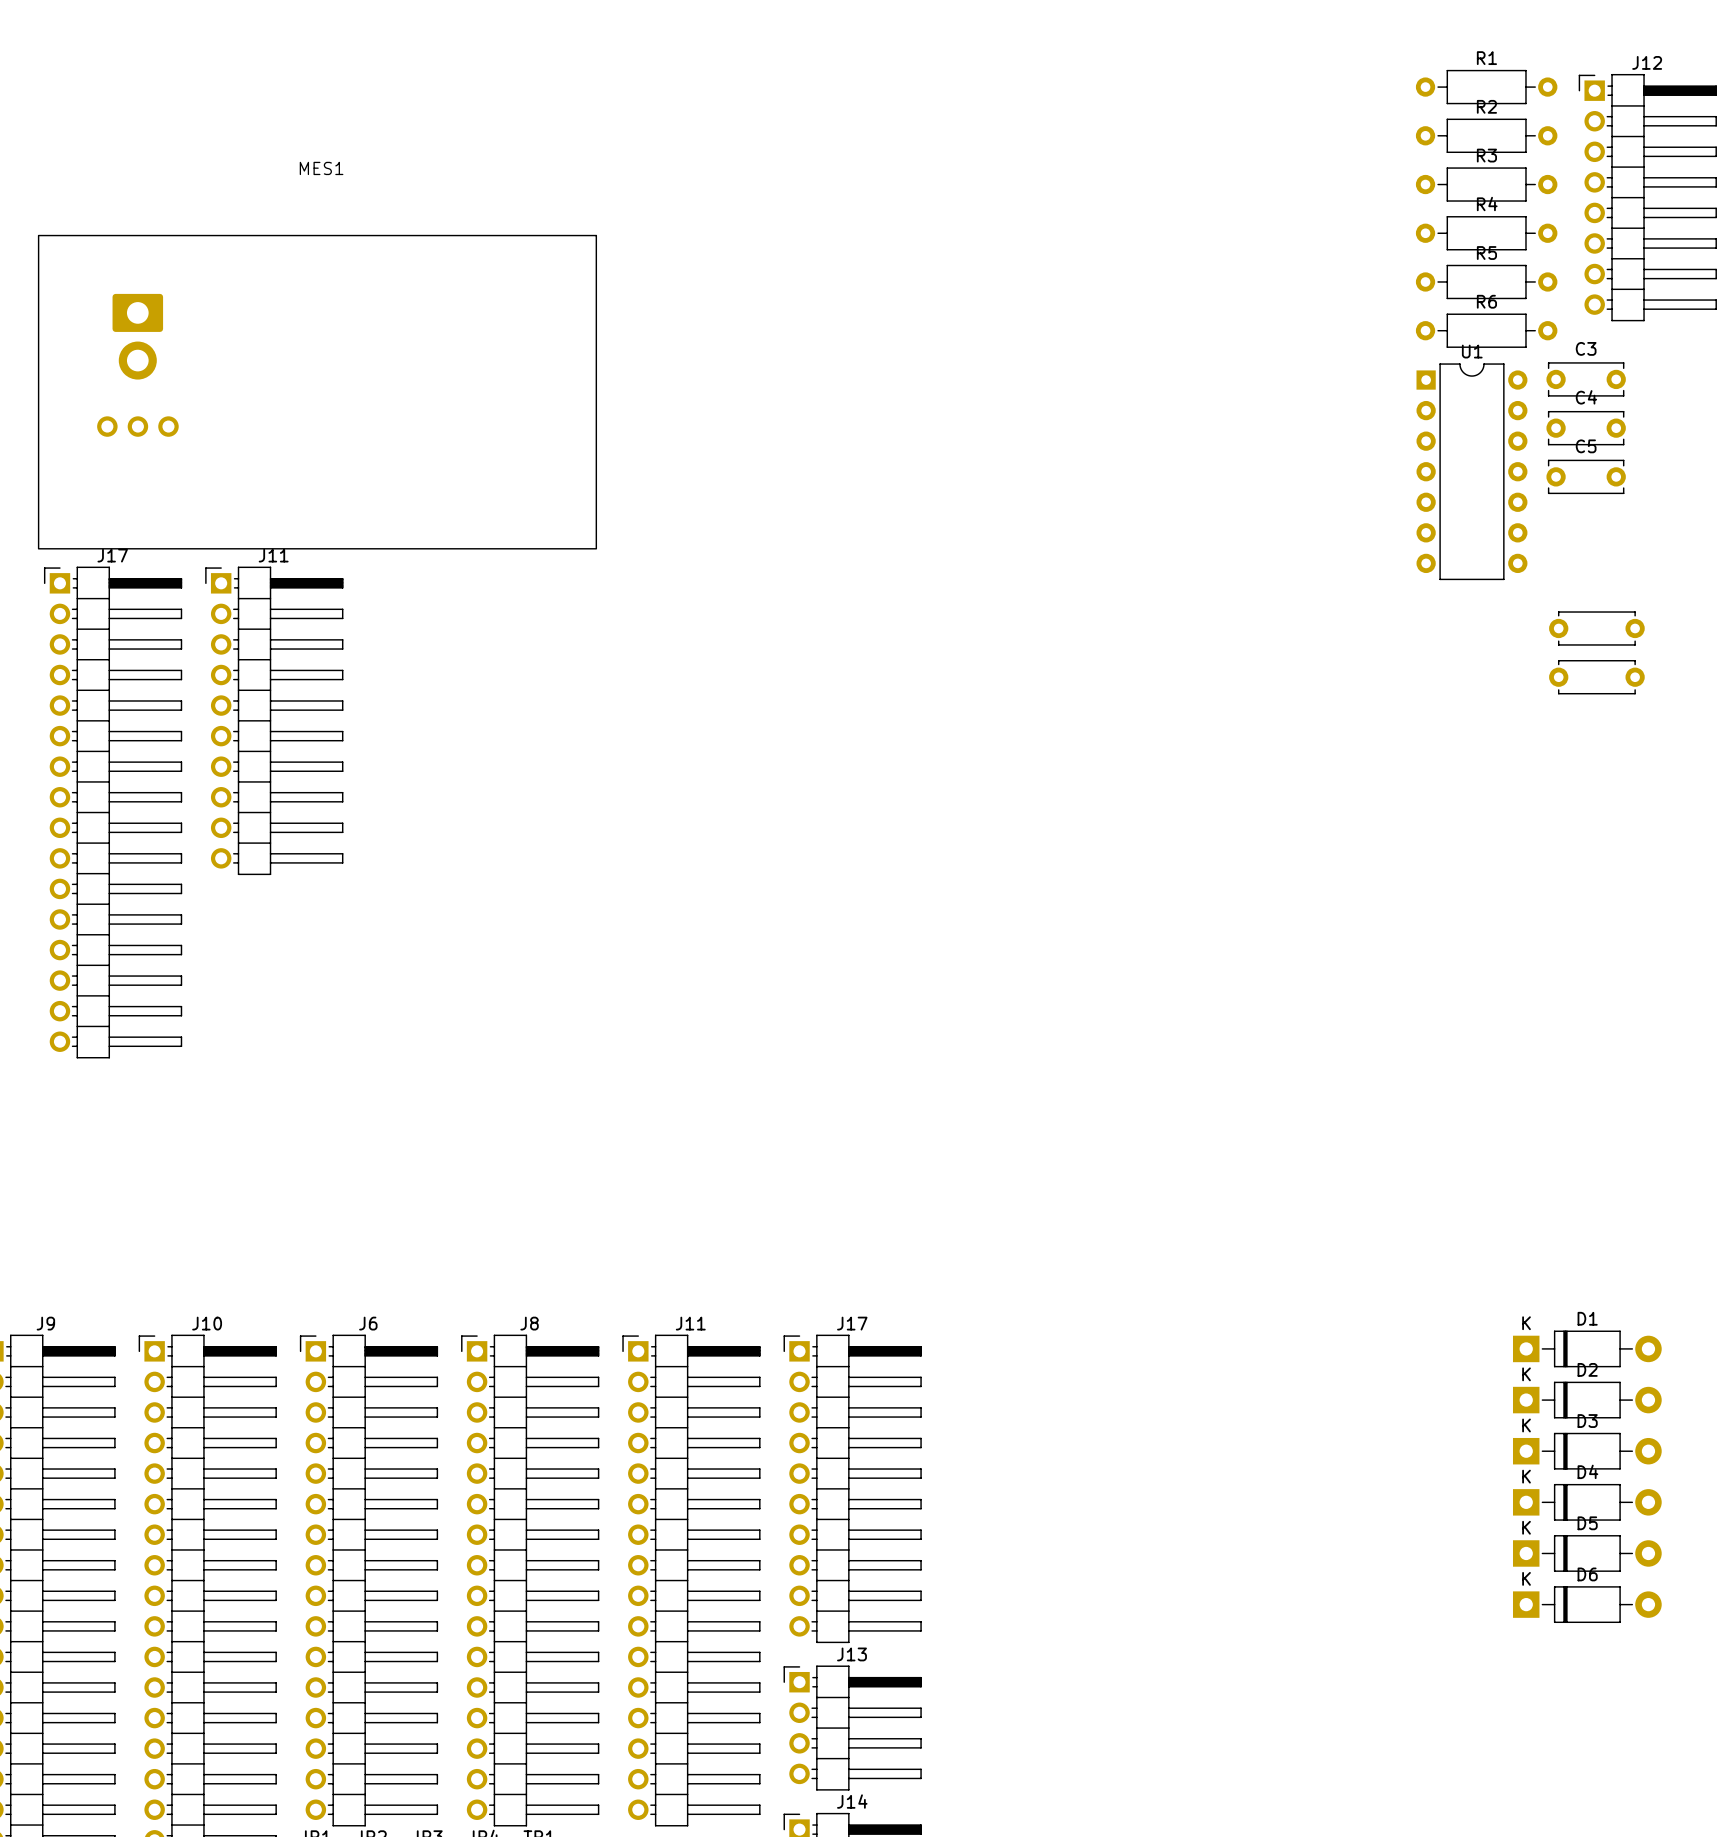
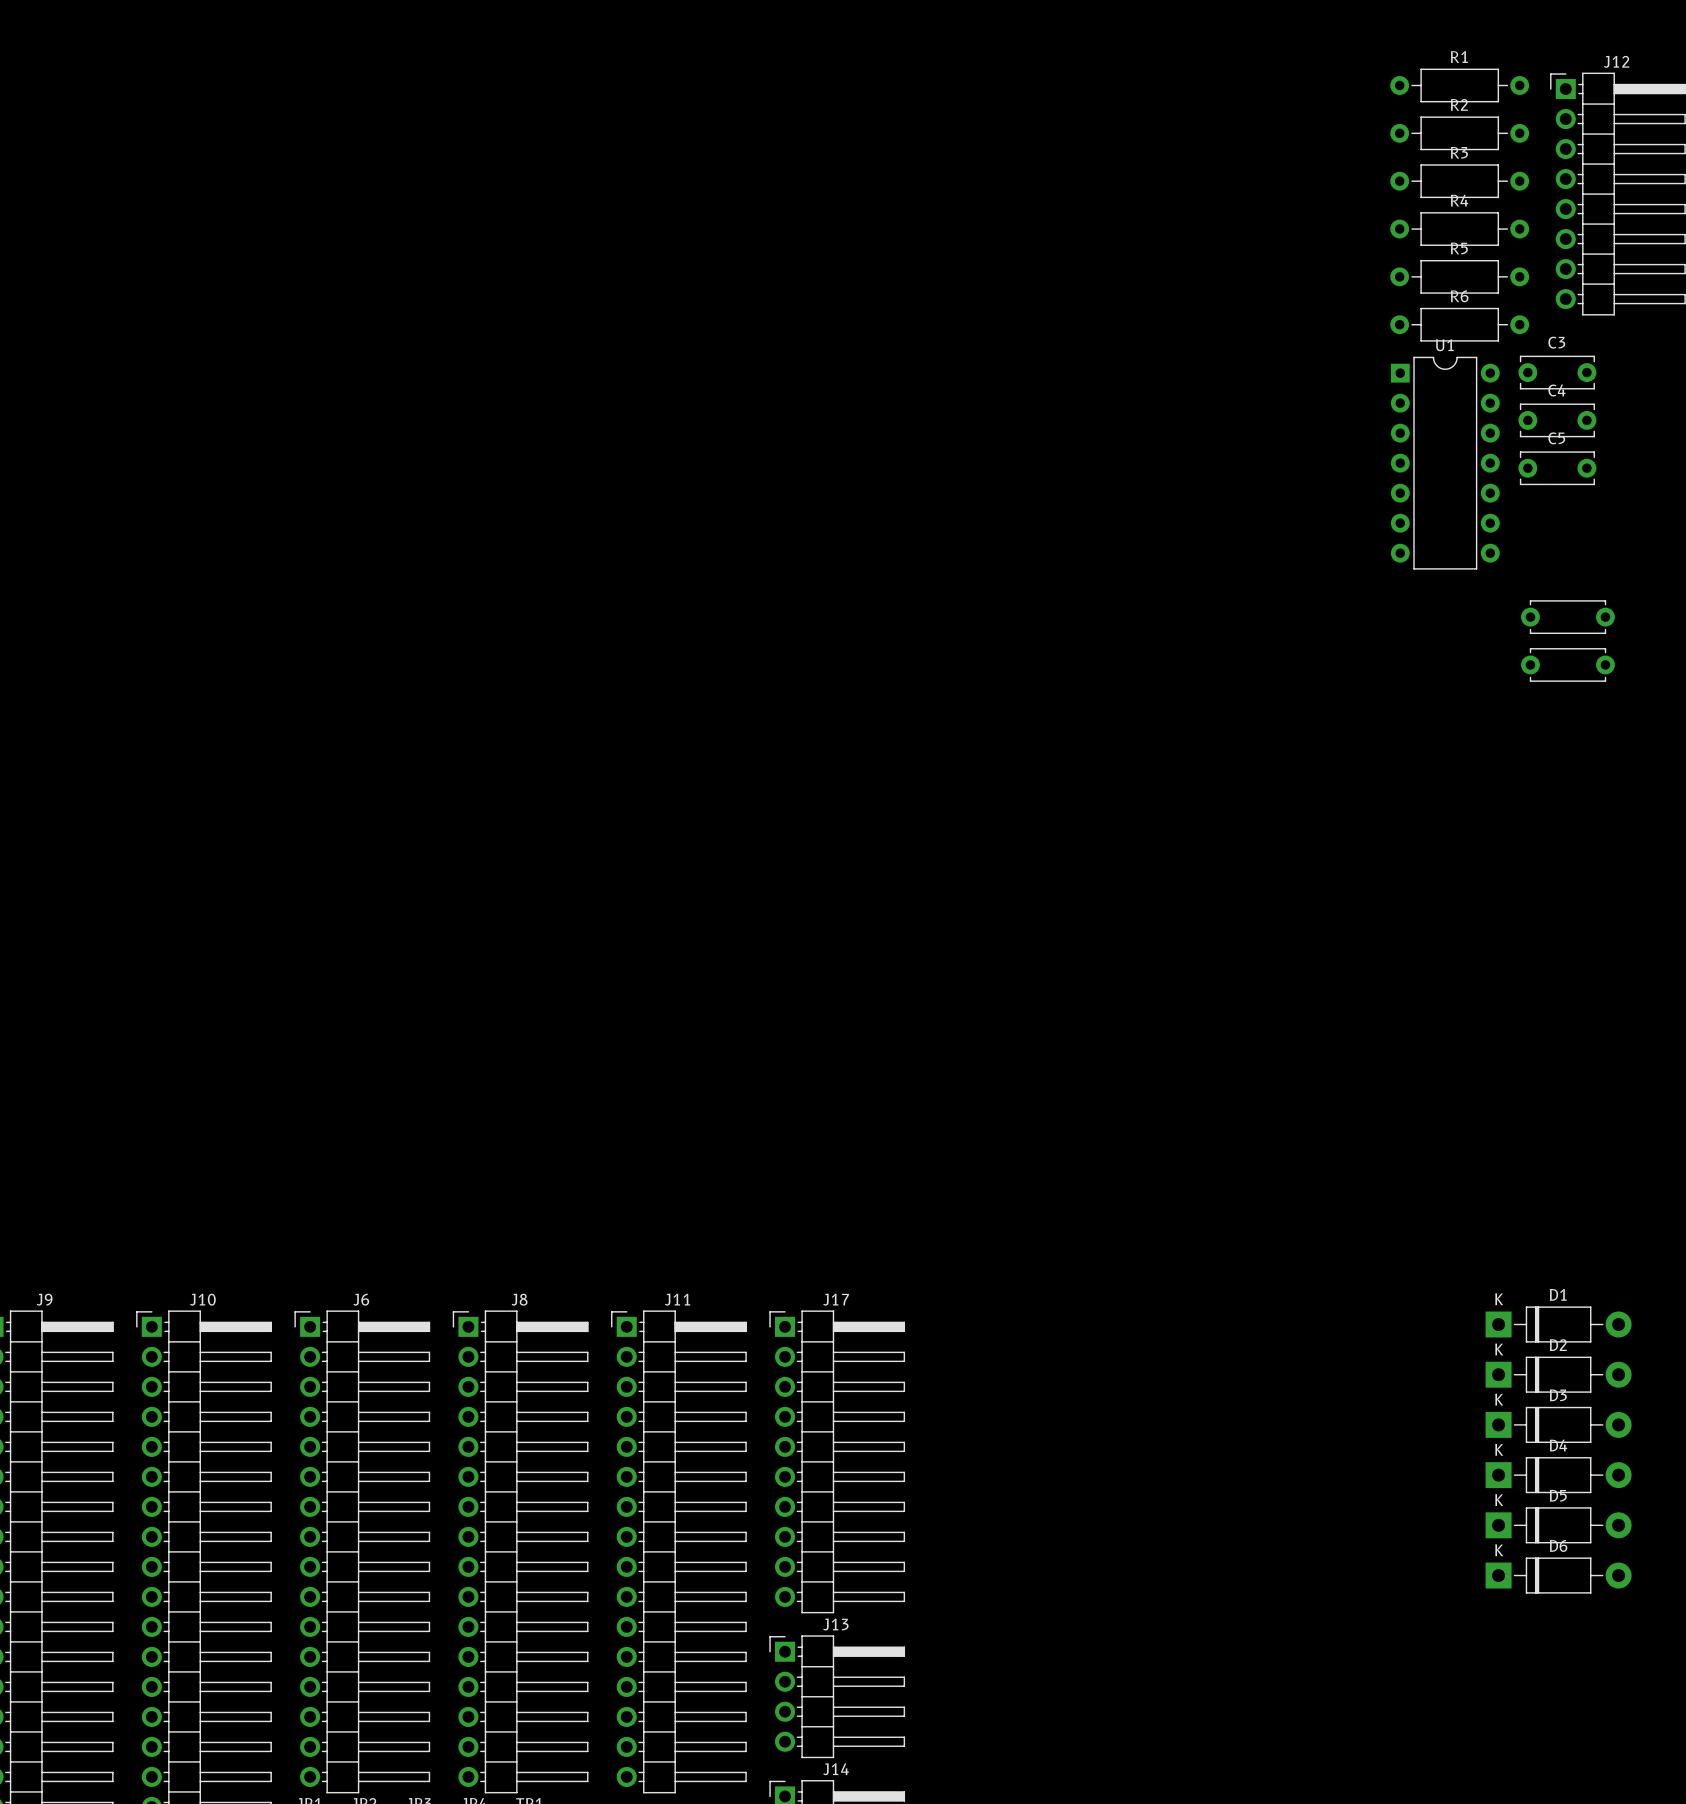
MES1: (317, 392) -> none
J11: (274, 720) -> none
J17: (113, 812) -> none

